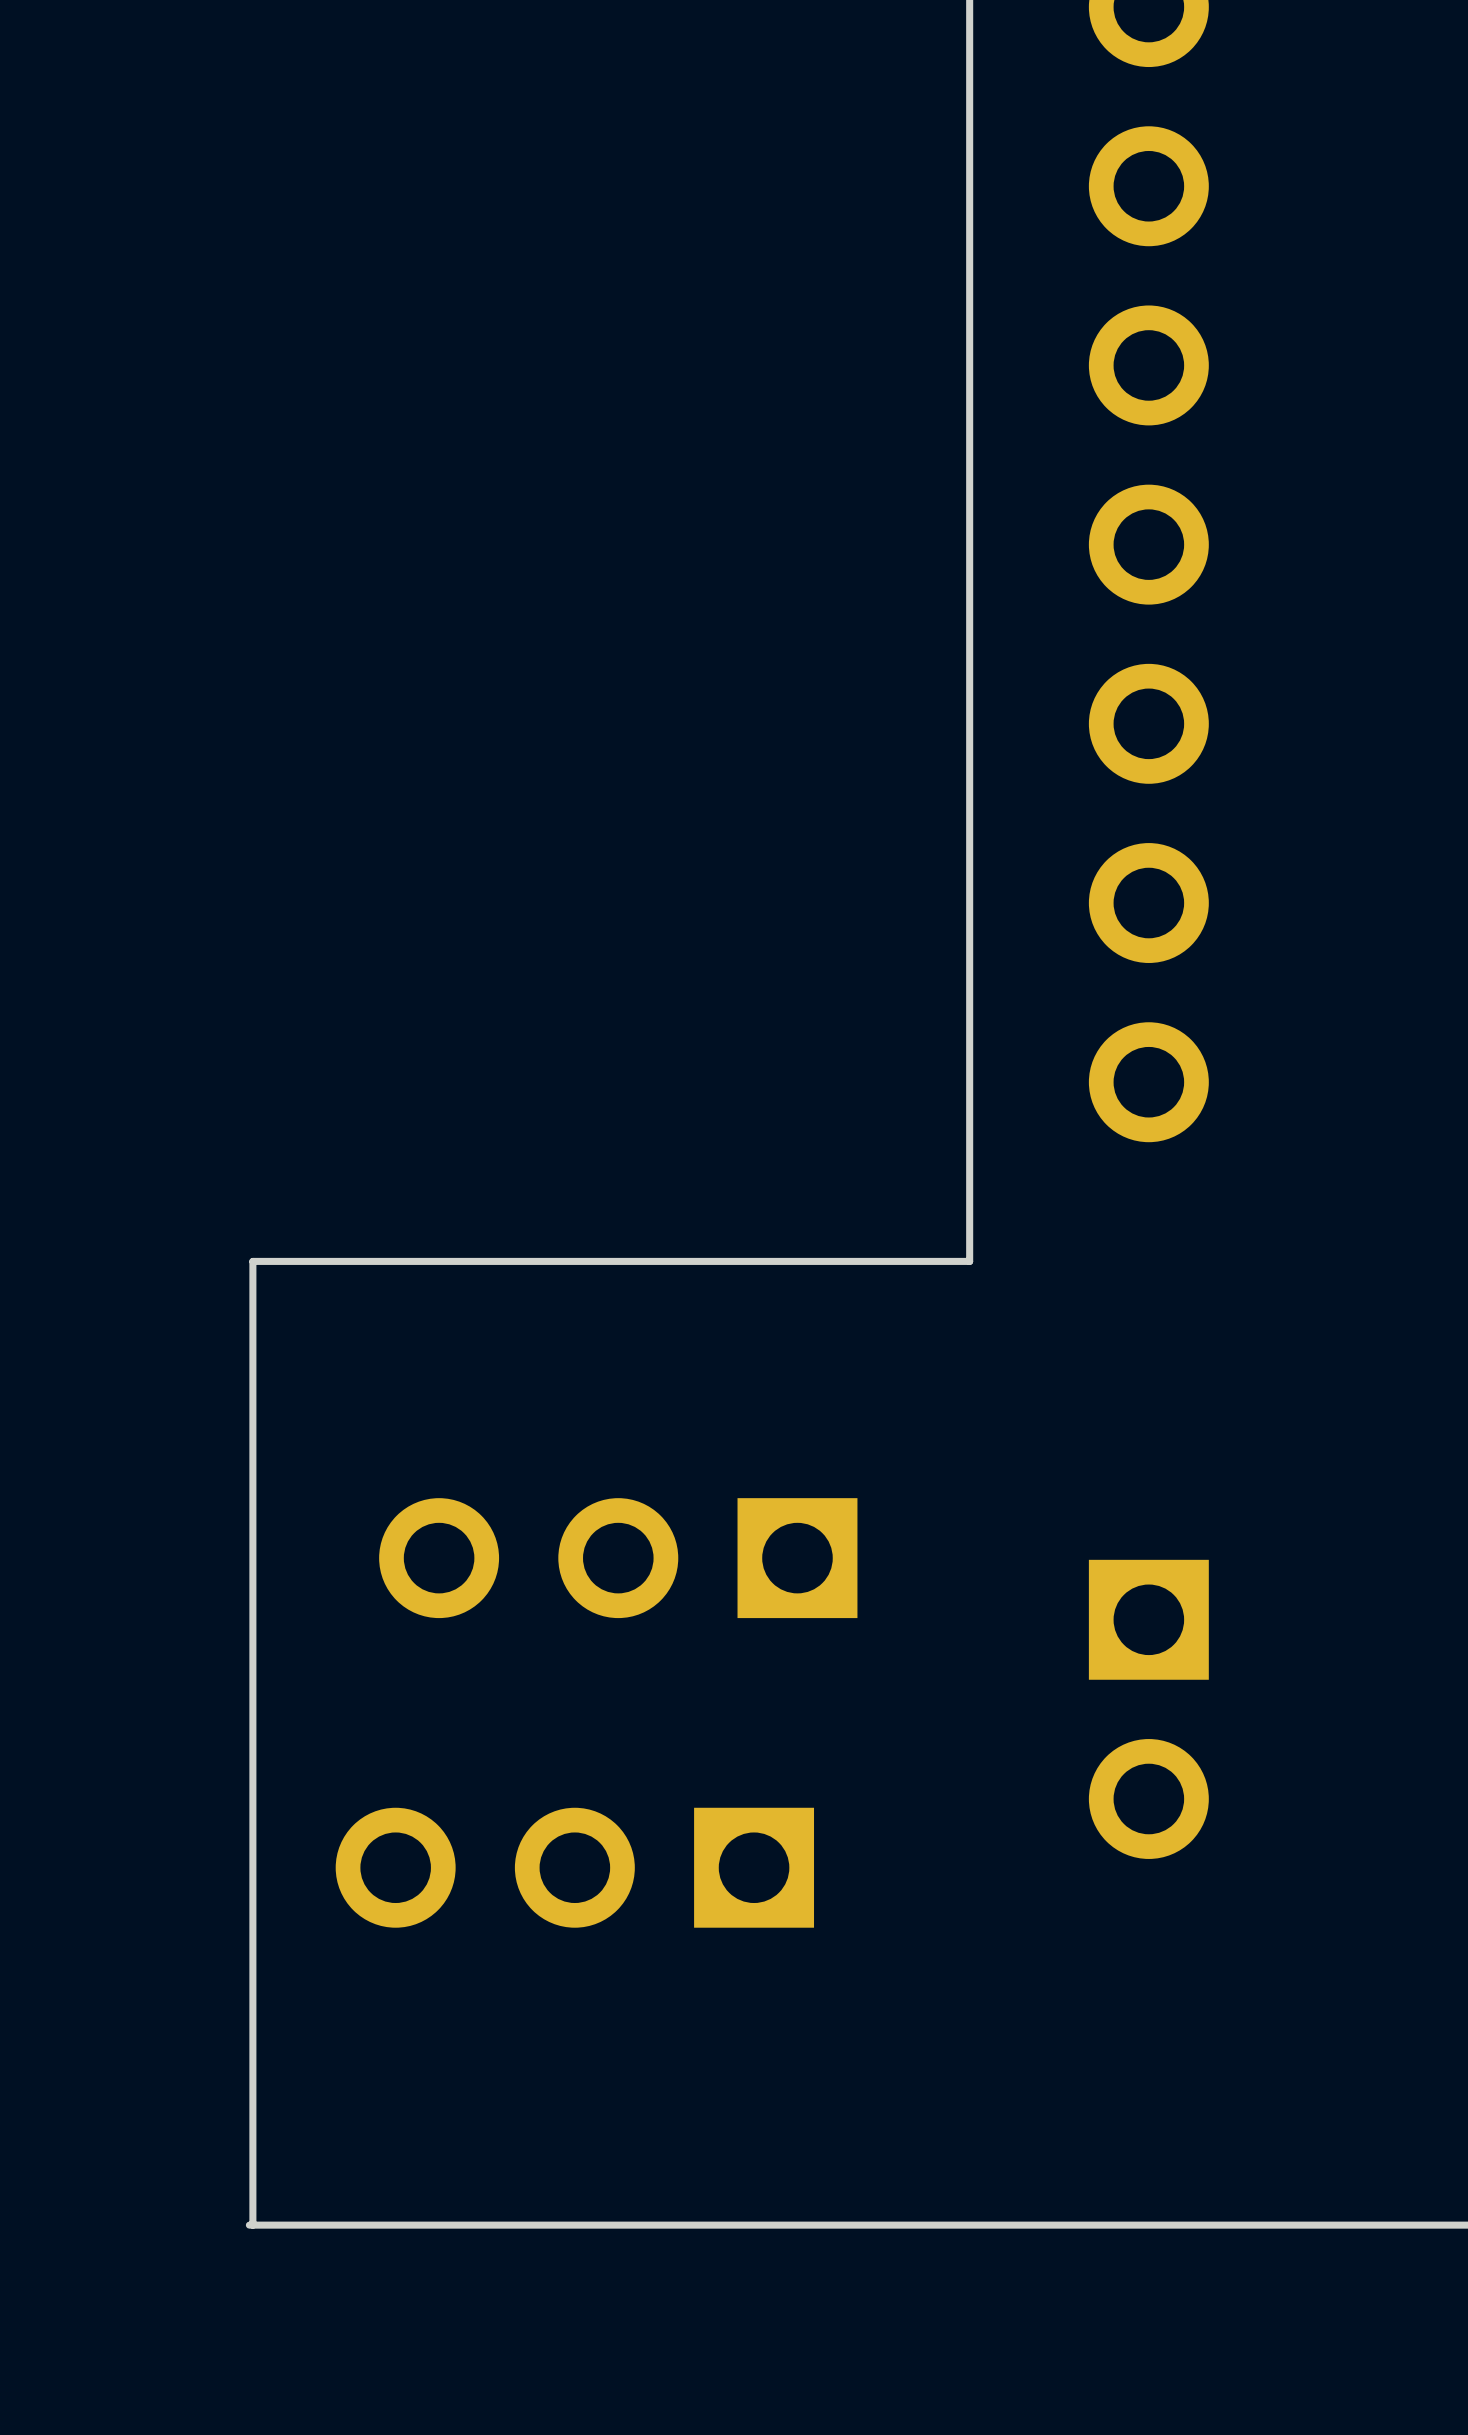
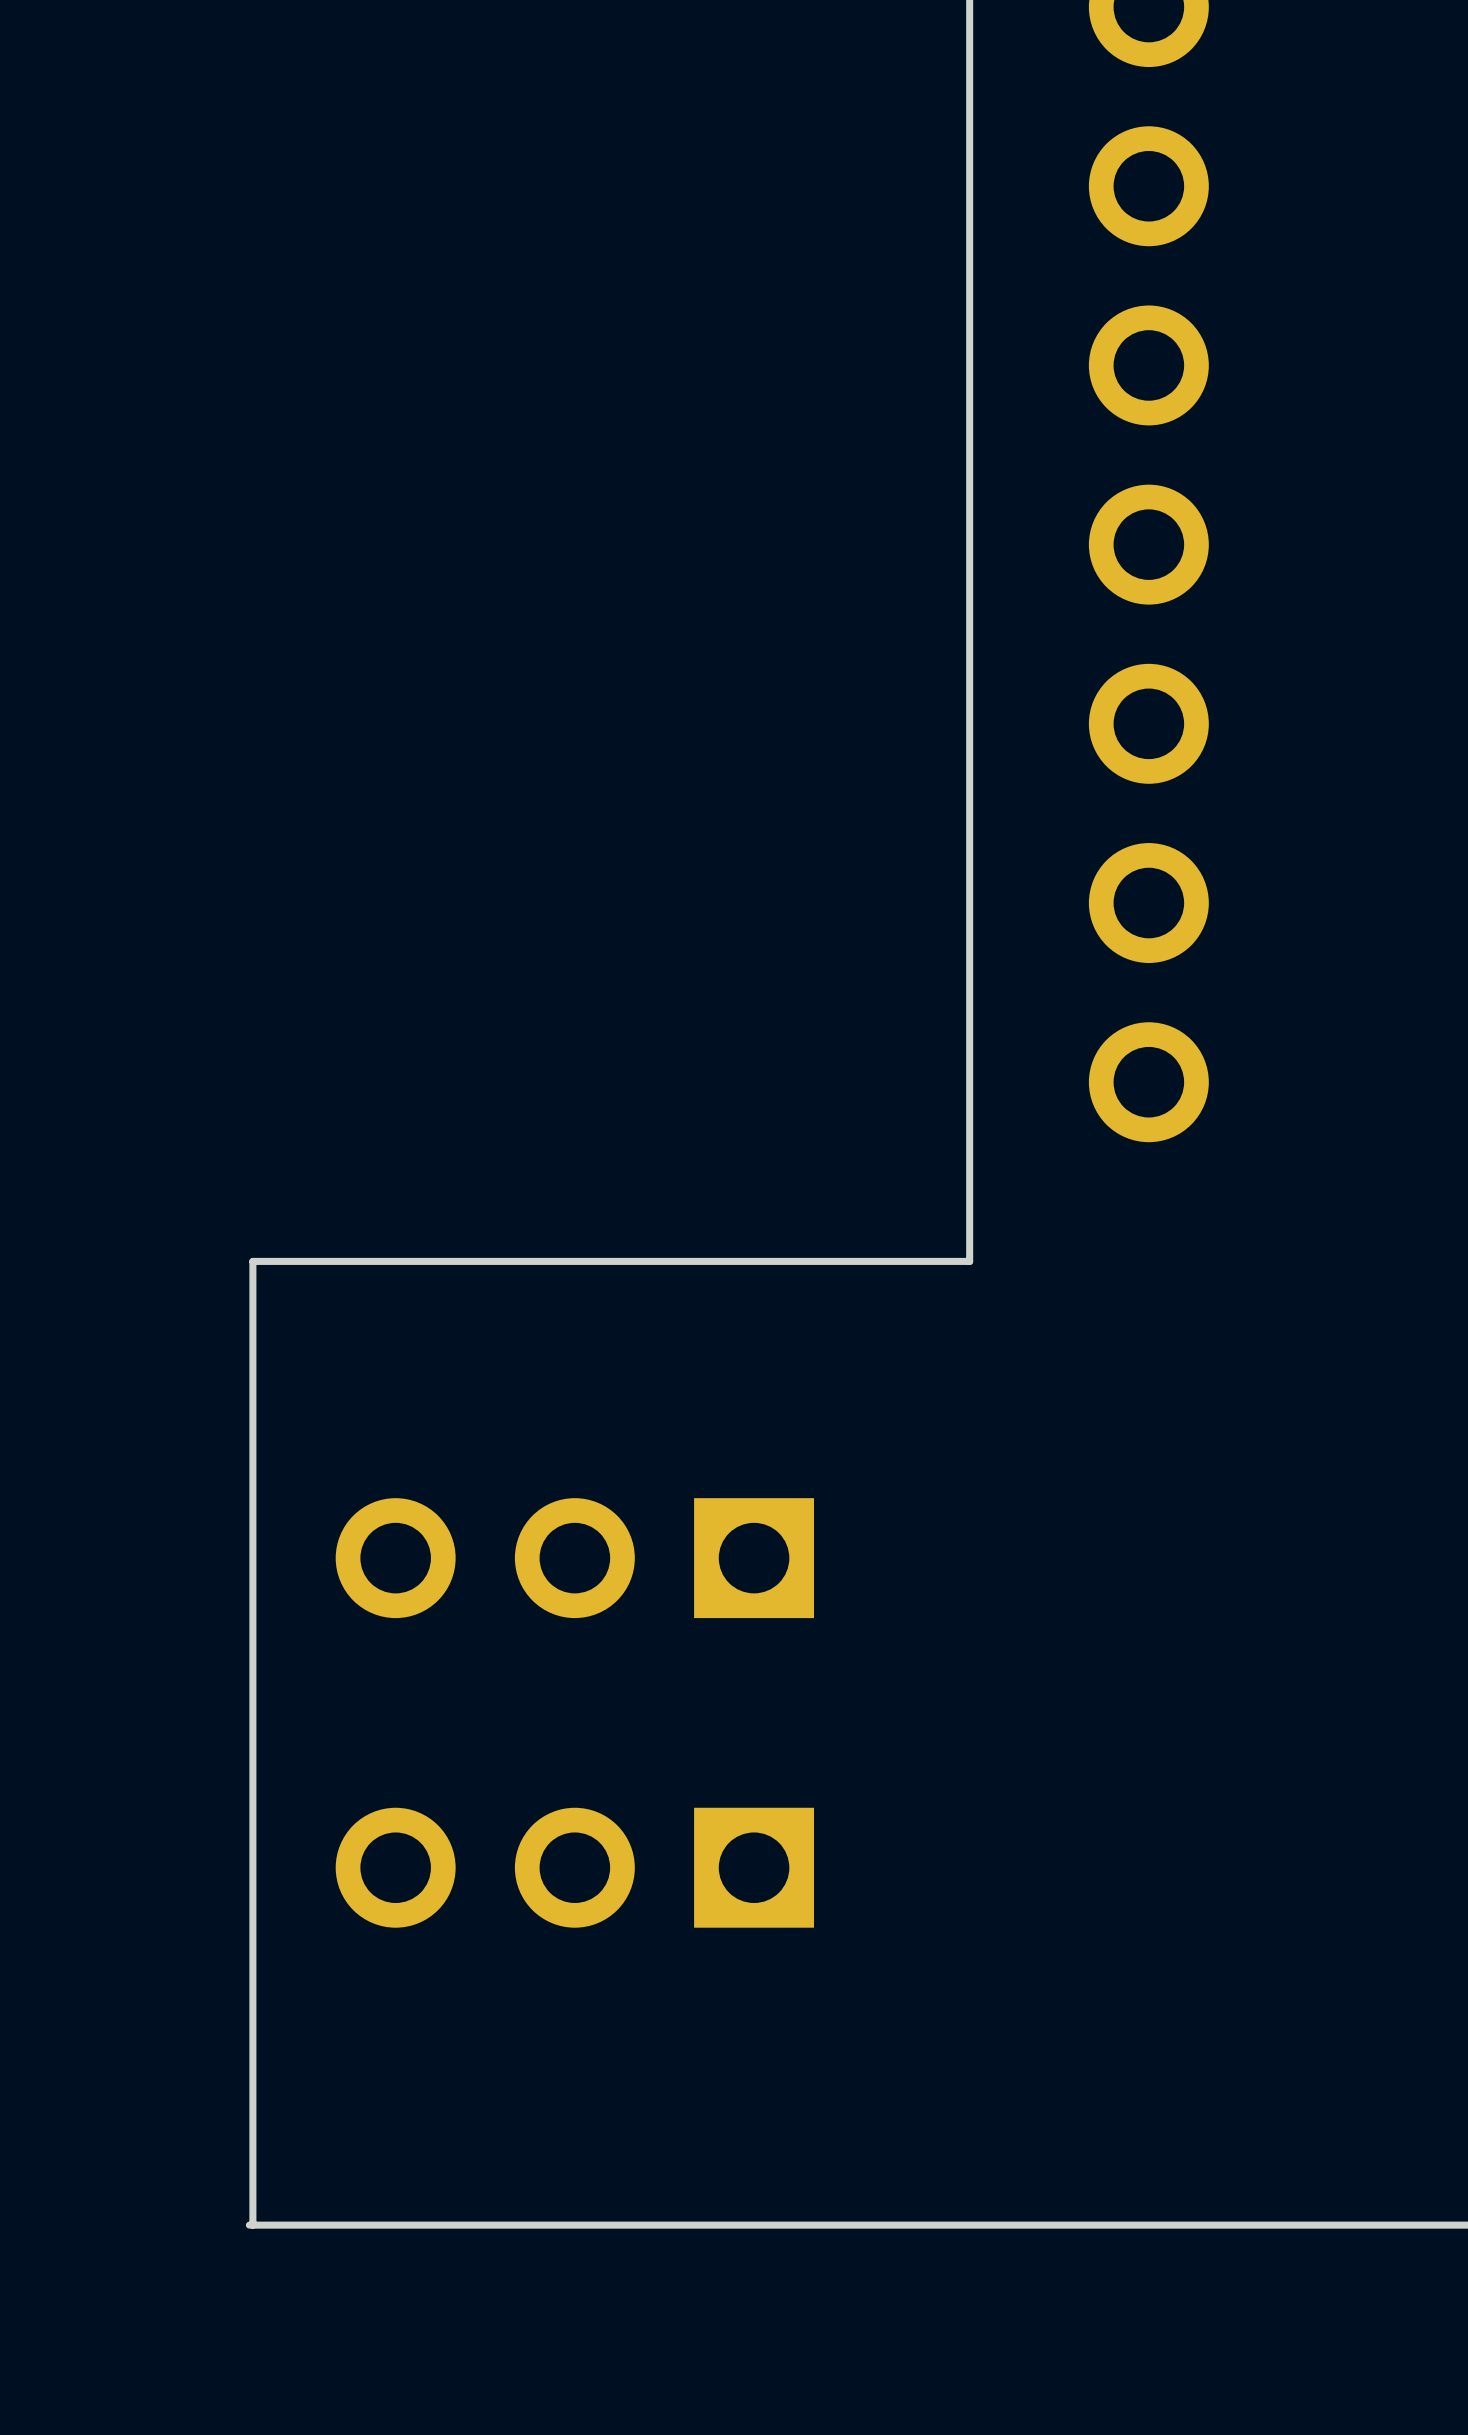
part position: (618, 1558) -> (574, 1558)
part: (1148, 1709) -> none

